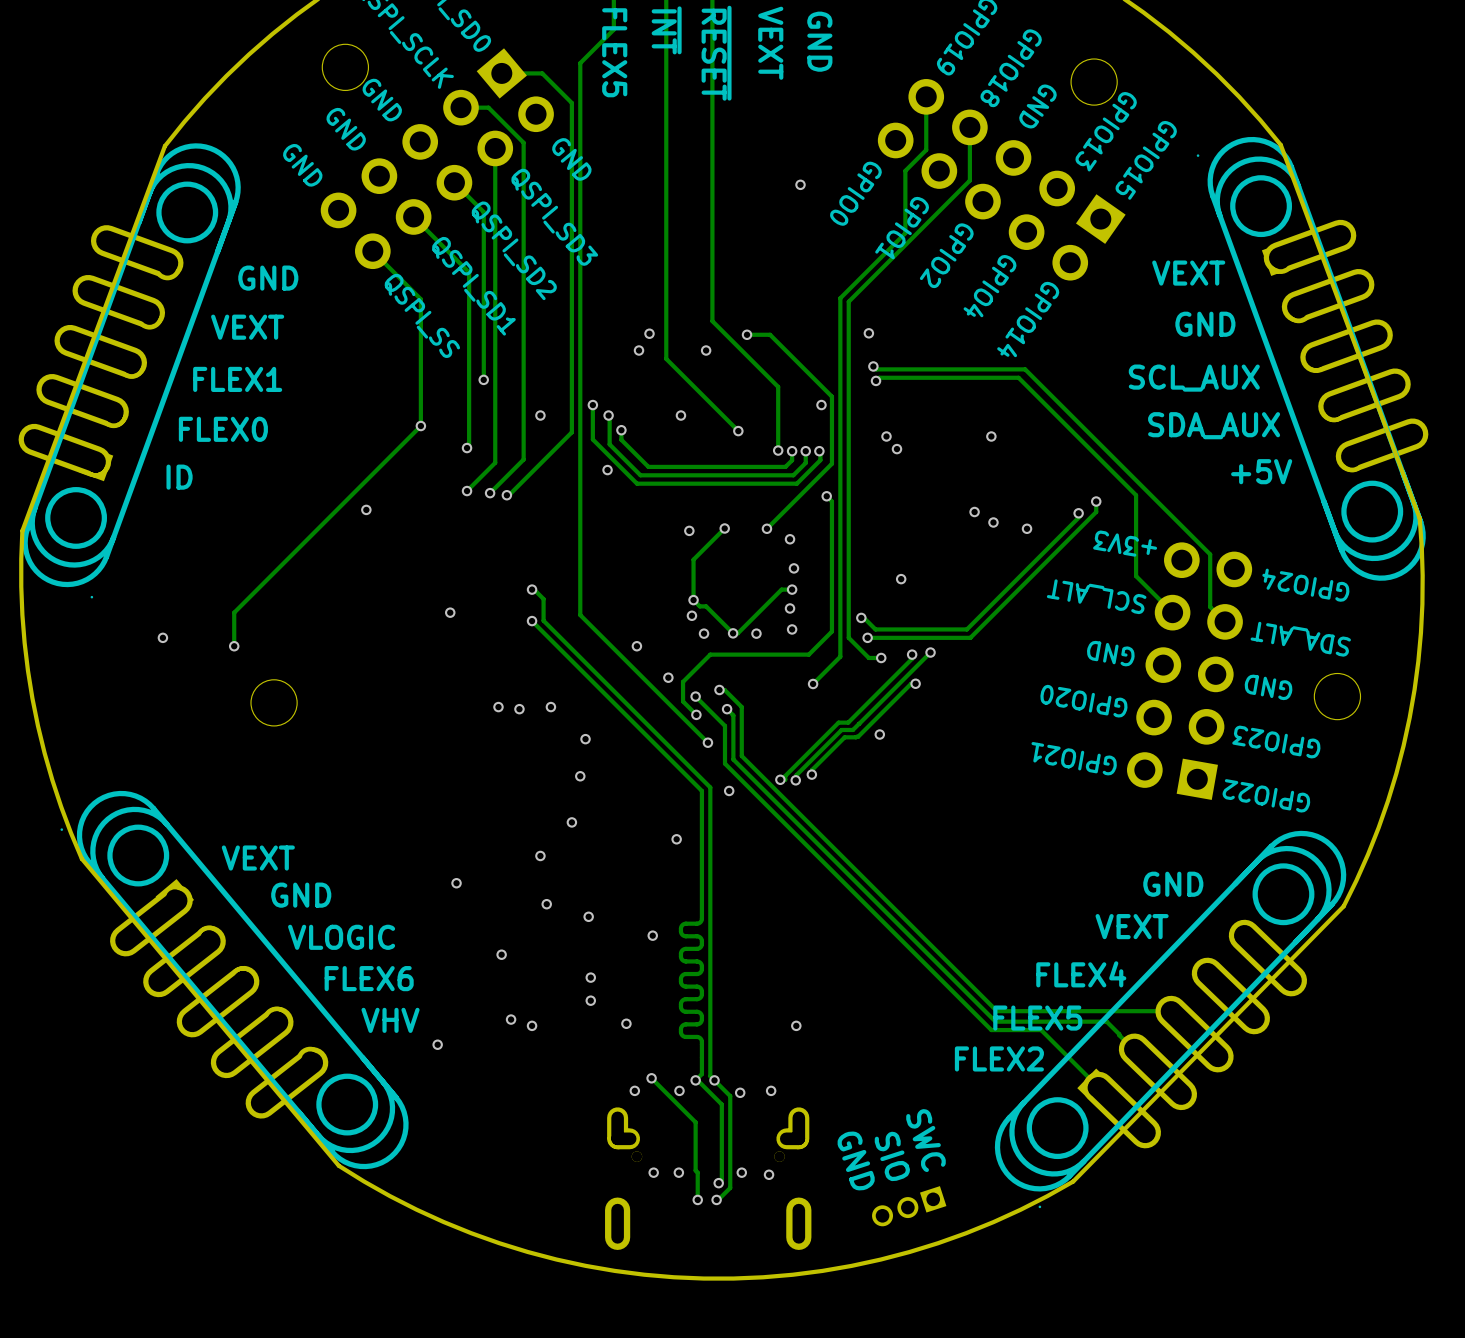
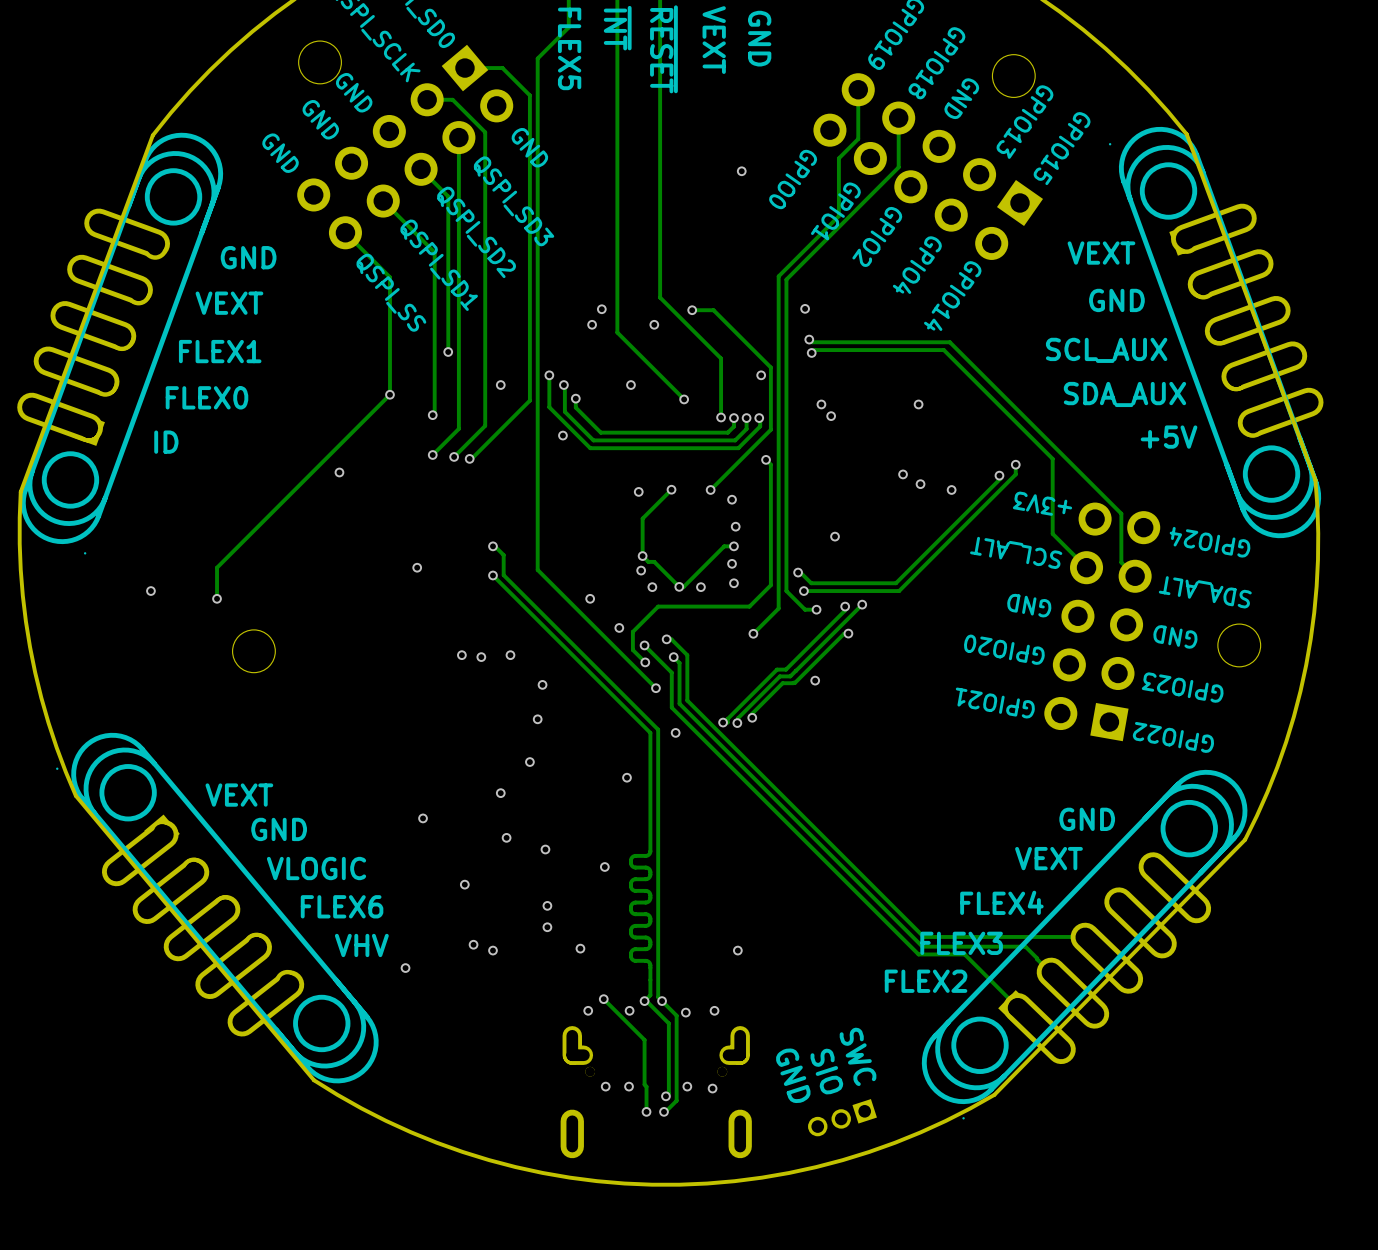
text: FLEX5 (1037, 1018) -> FLEX3 (961, 943)

